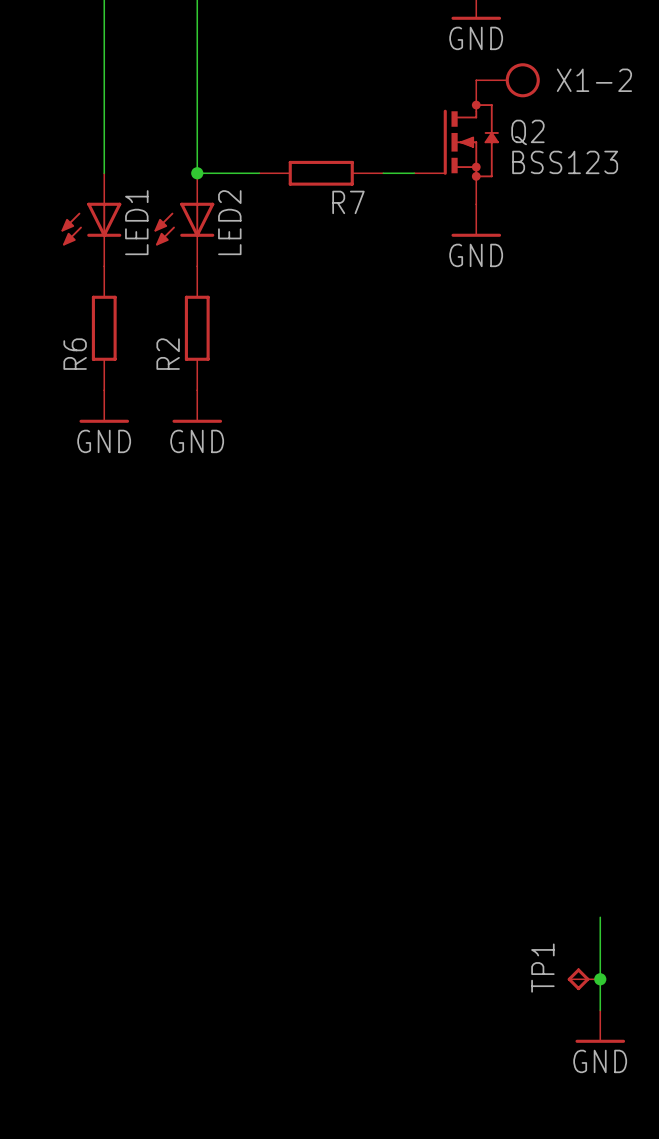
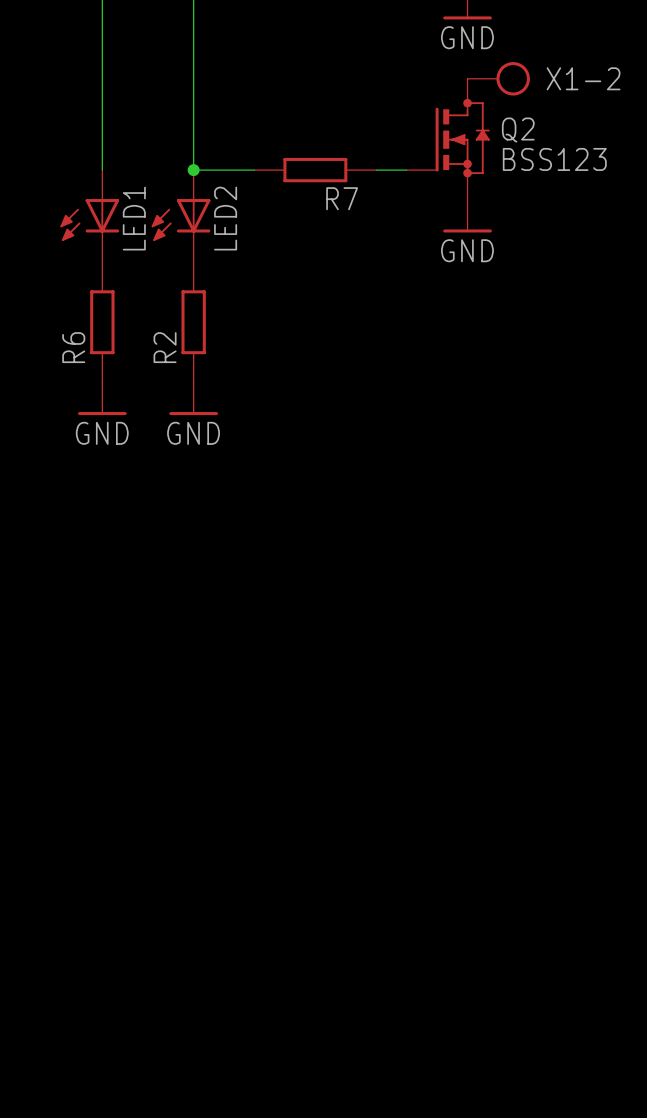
wire: (600, 917) (600, 1010) -> none
TP1: (584, 979) -> none
junction: (600, 979) -> none
power symbol: GND (600, 1026) -> none

